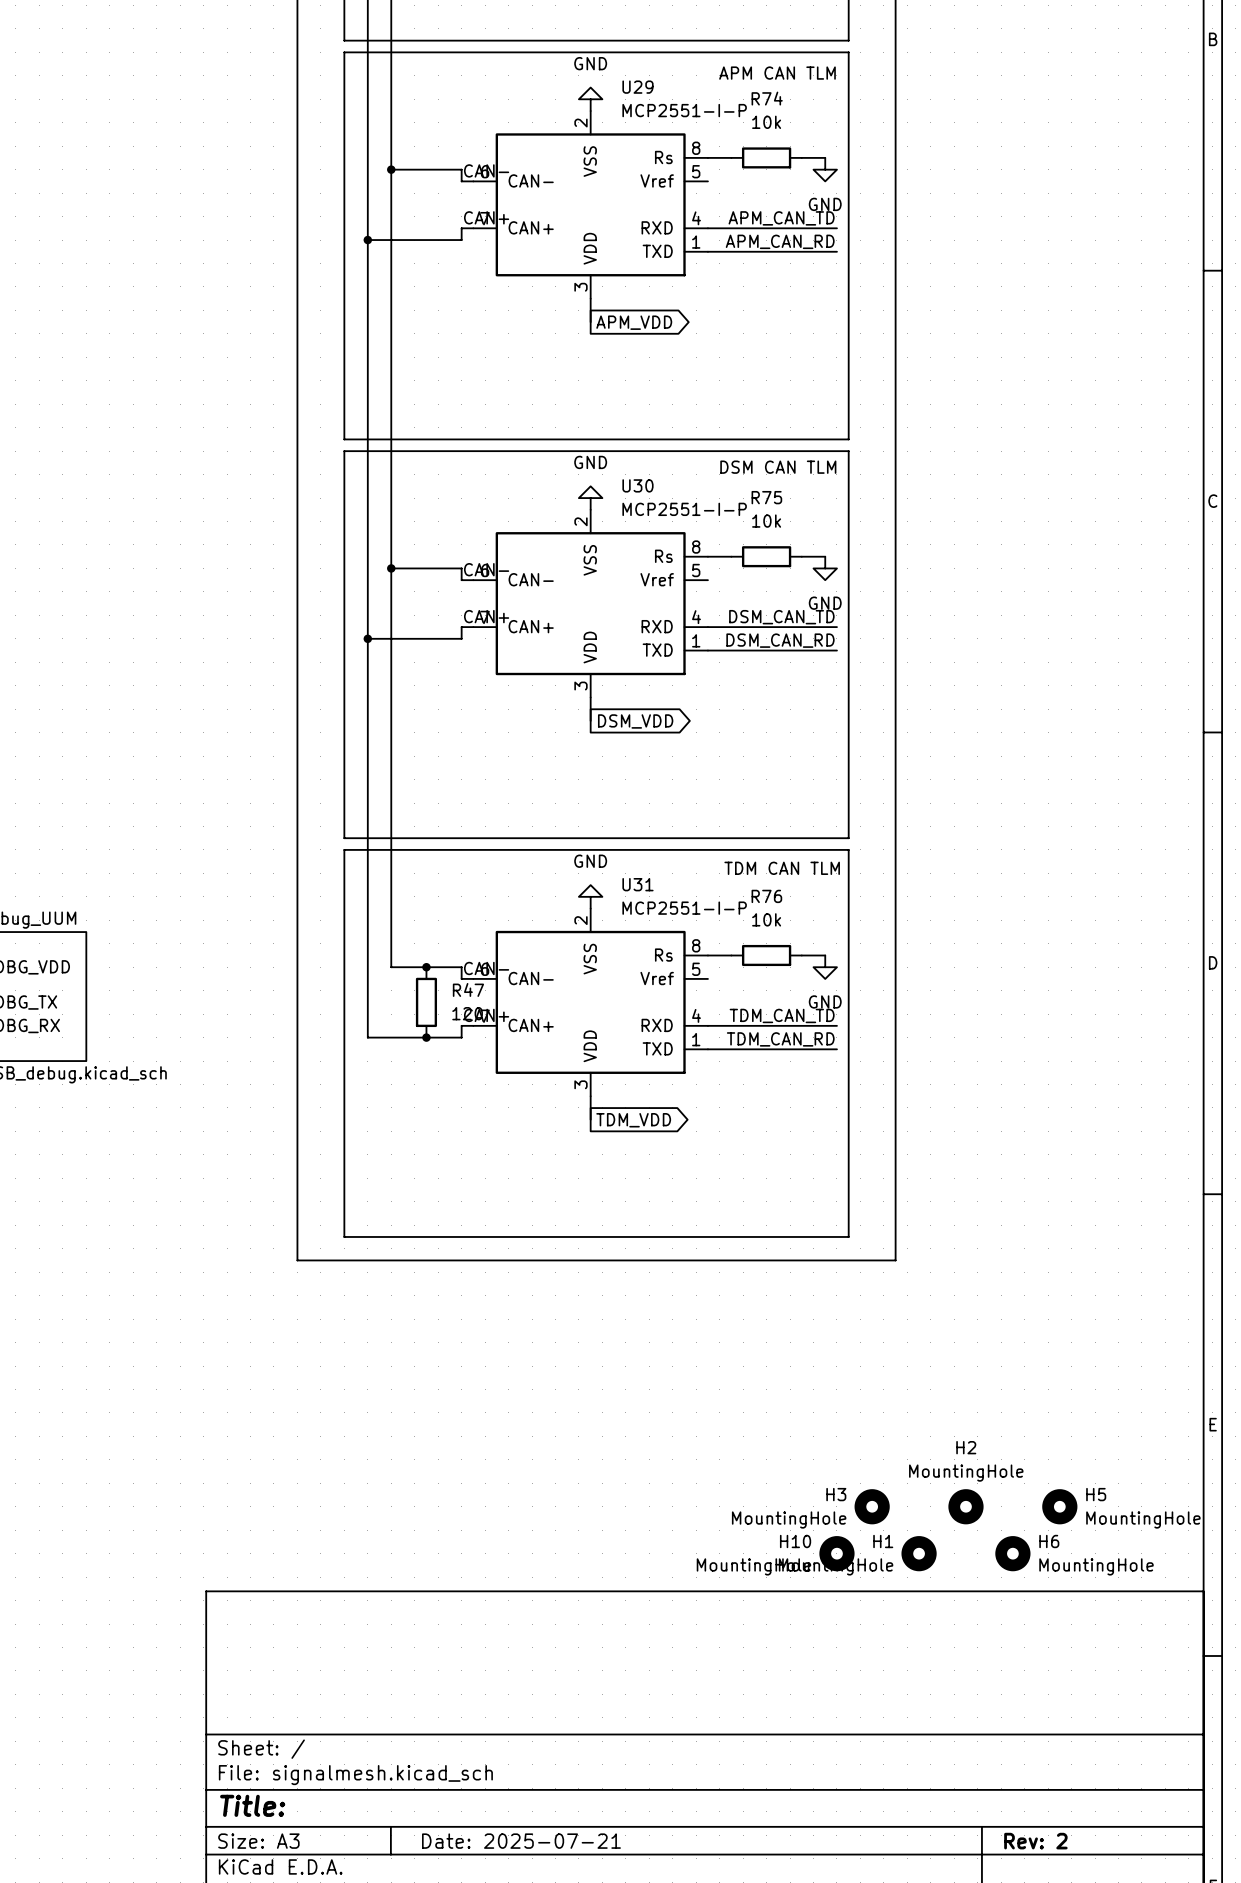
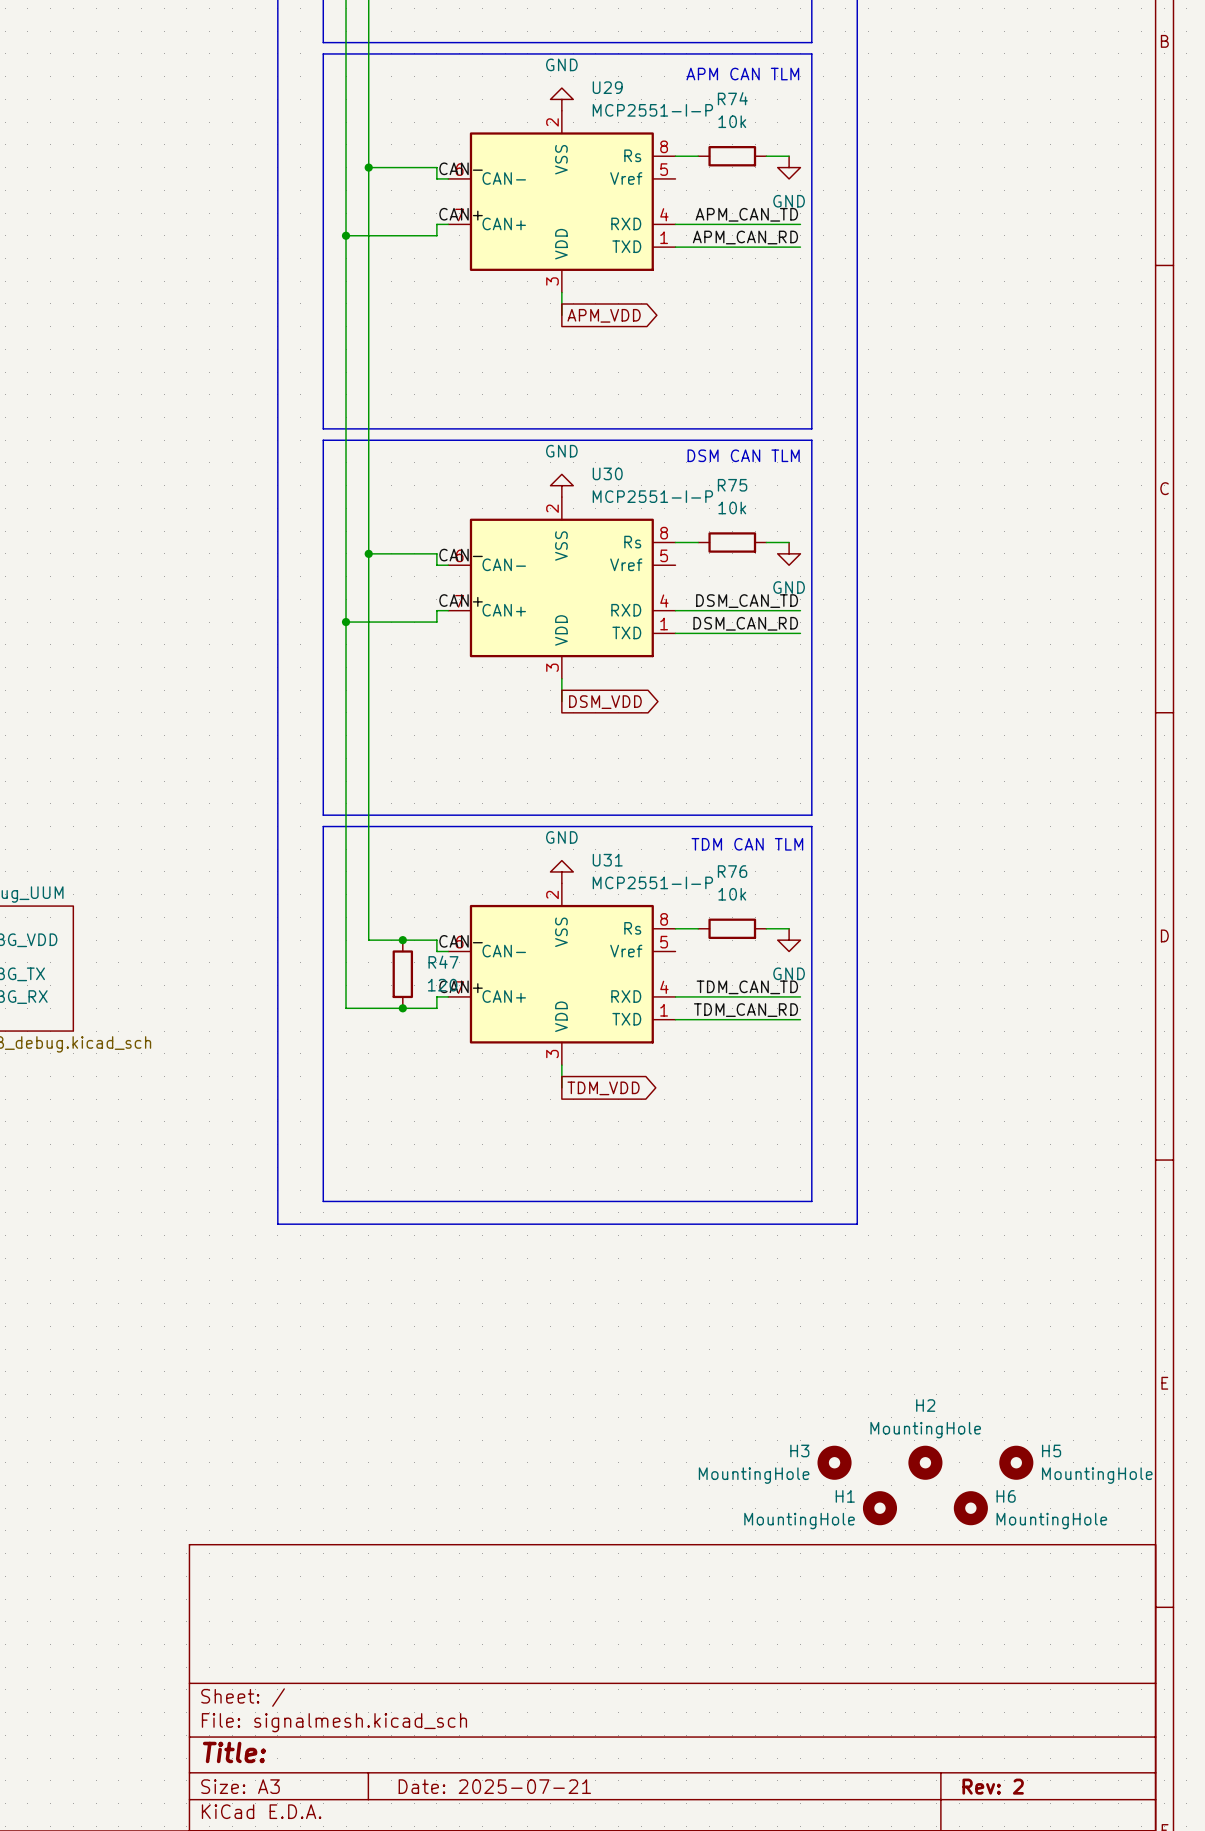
H10: MountingHole (836, 1553) -> none

